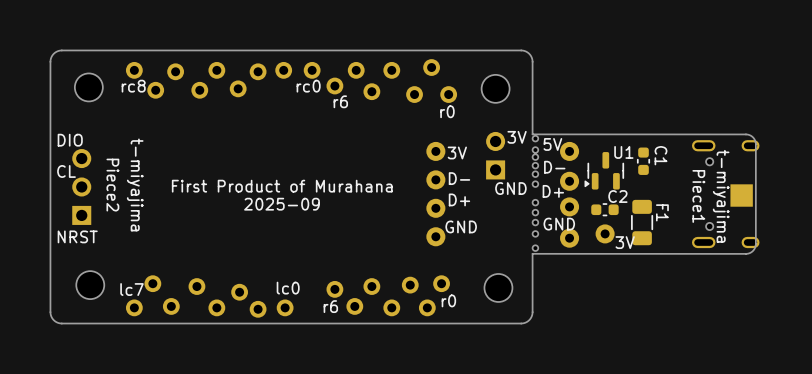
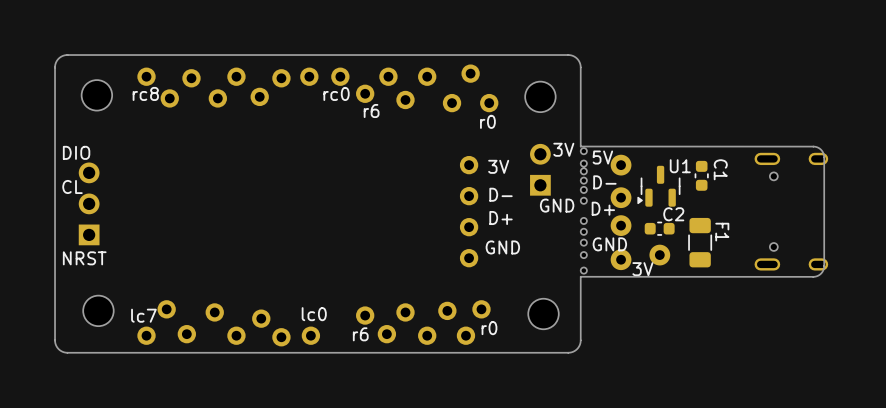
part footprint: [426, 141, 446, 247] -> [459, 155, 479, 268]
text: t-miyajima (135, 184) -> none
text: Piece2 (112, 185) -> none
text: First Product of Murahana (282, 186) -> none
part: (741, 195) -> none
text: Piece1 (698, 196) -> none
text: t-miyajima (721, 196) -> none
text: 2025-09 (282, 204) -> none
text position: 3V (625, 242) -> 3V (642, 269)

